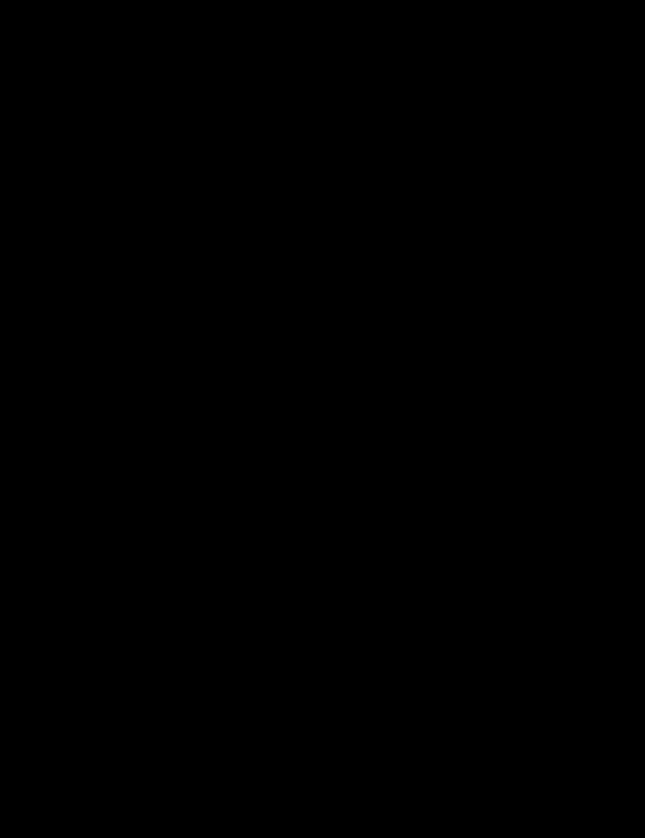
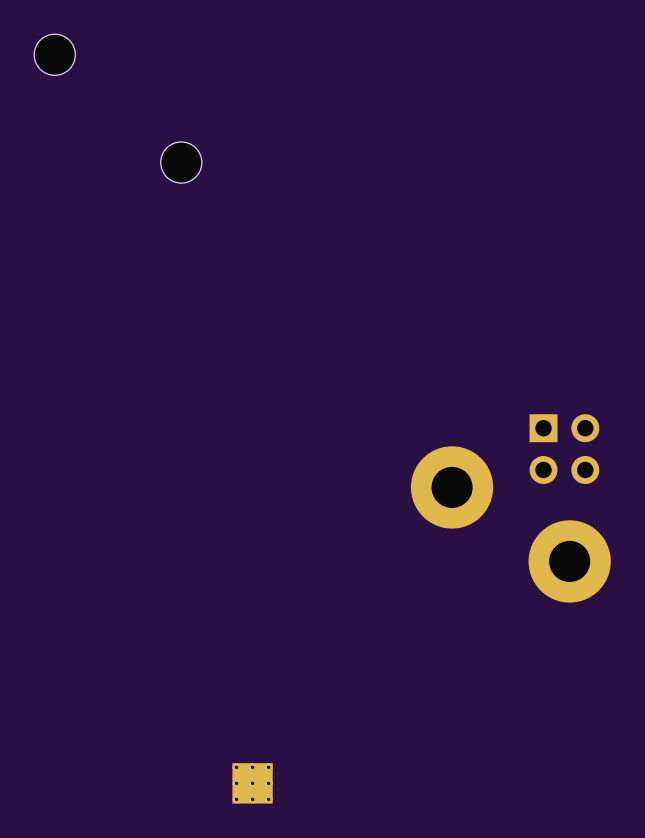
part: none -> (54, 54)
part: none -> (181, 162)
part: none -> (564, 449)
part: none -> (452, 487)
part: none -> (569, 561)
part: none -> (252, 783)

